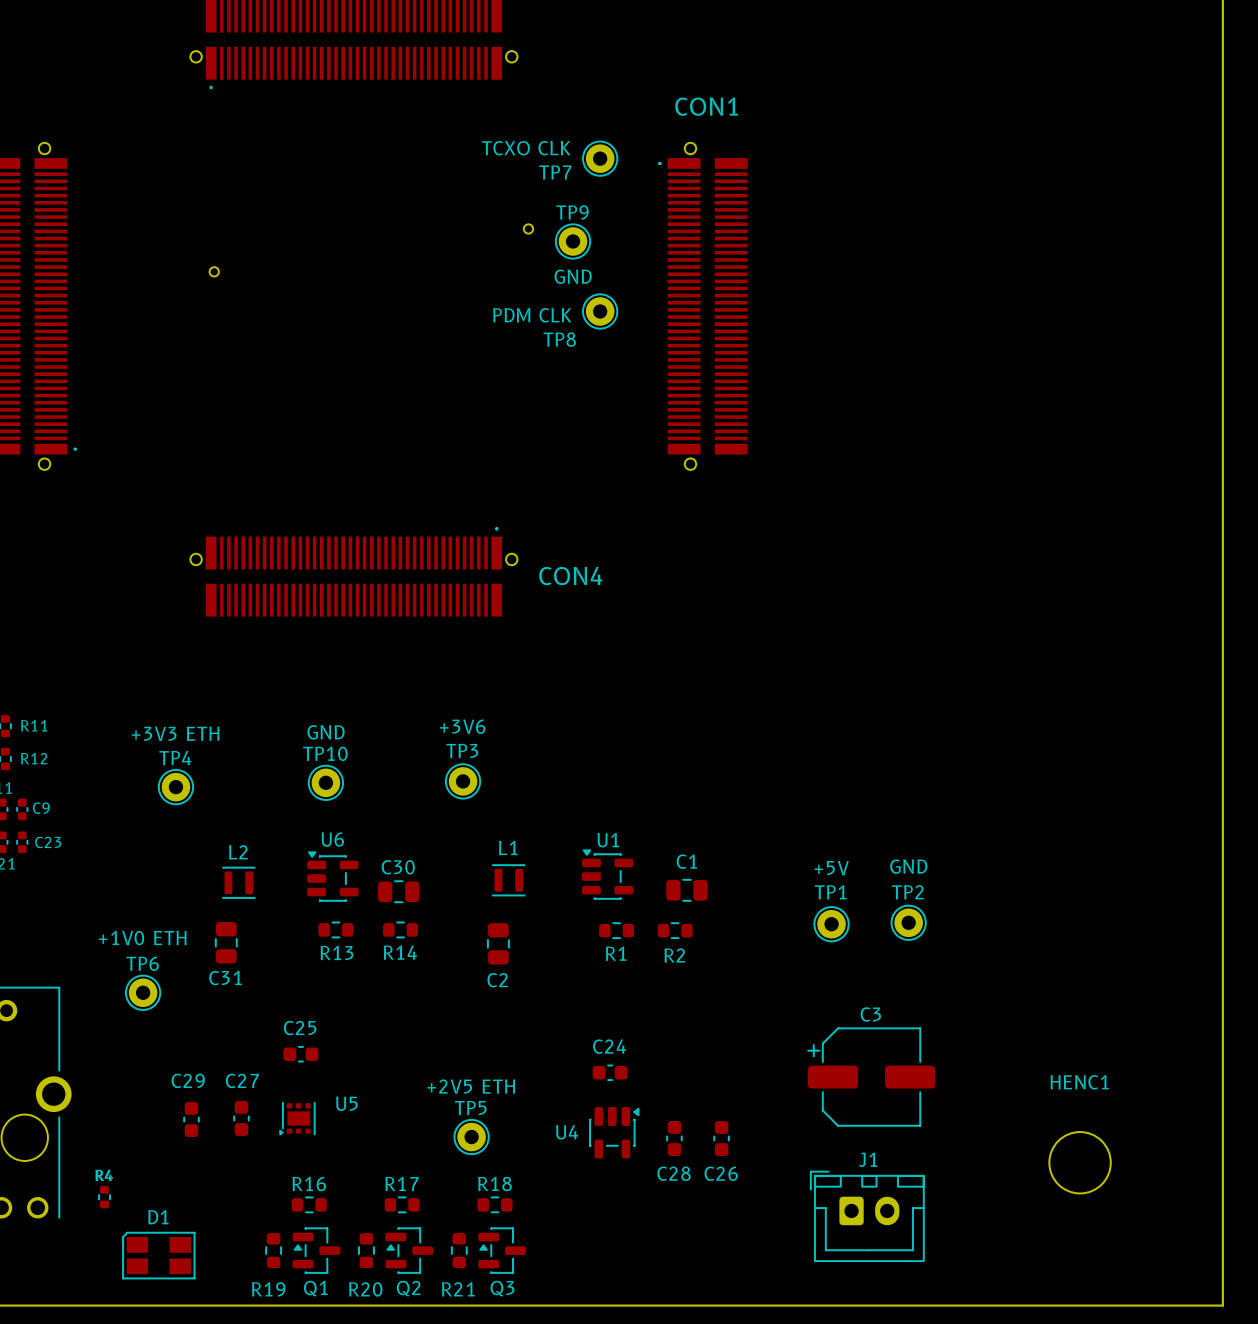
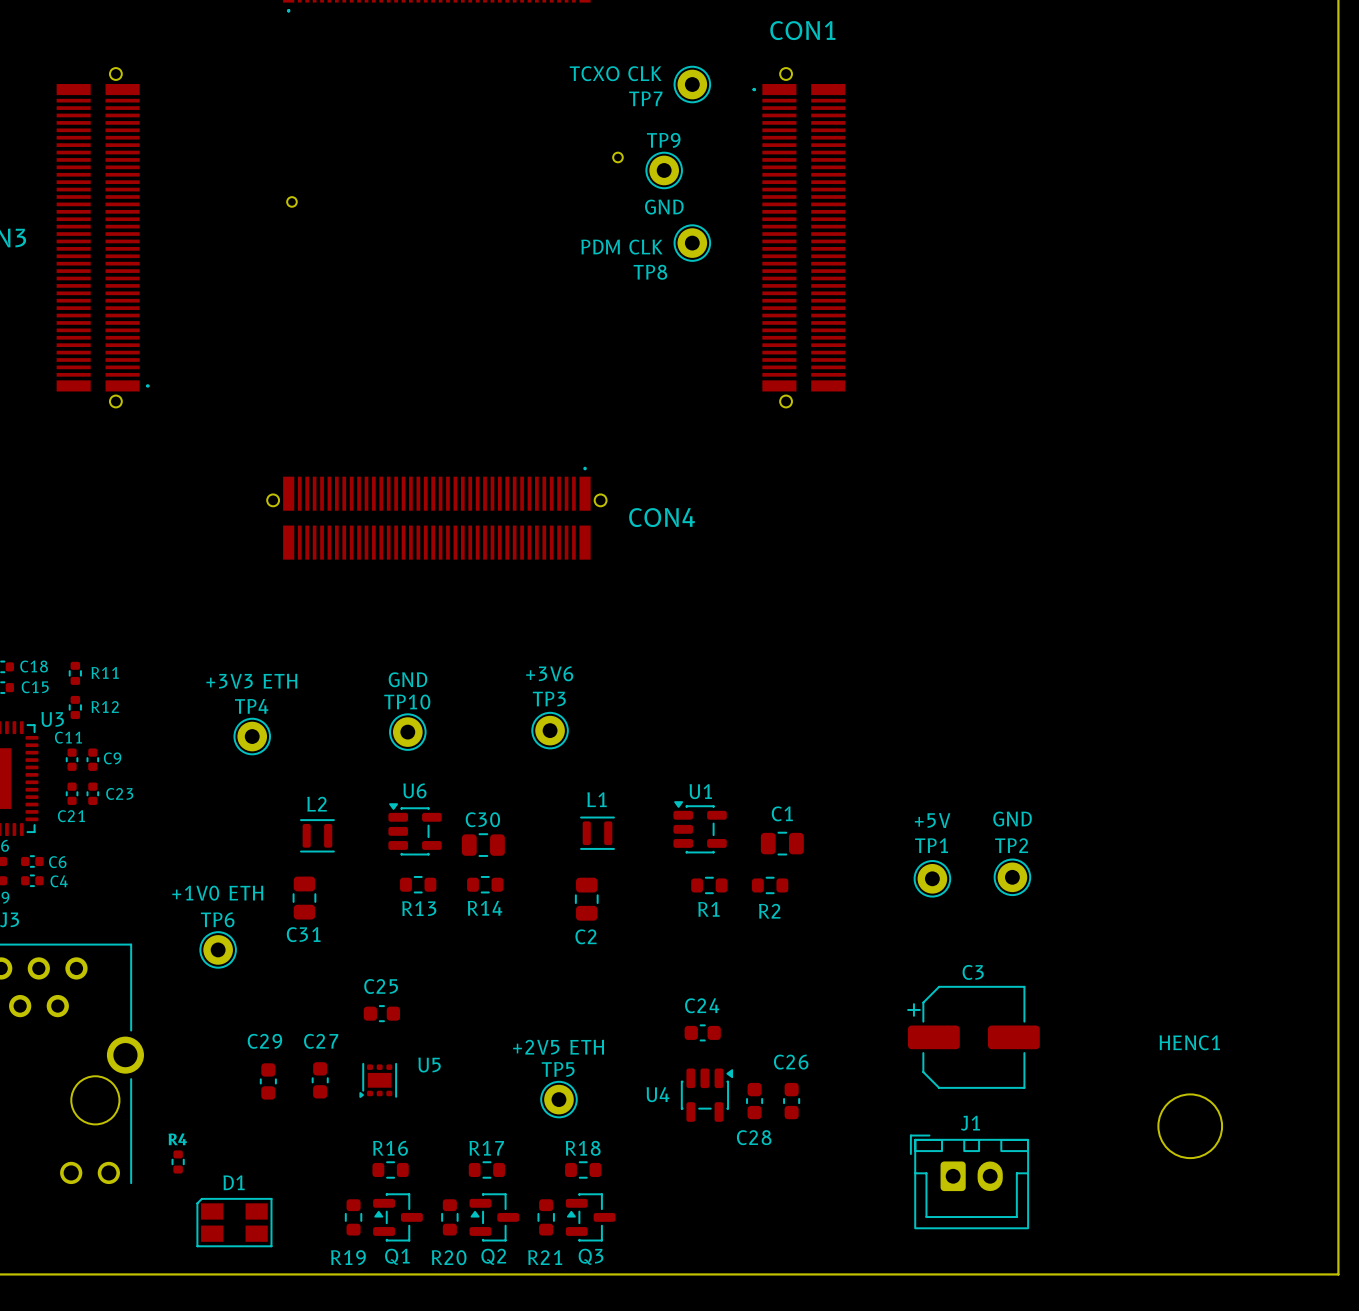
C28 position: (674, 1138) -> (754, 1101)
C26 position: (721, 1138) -> (791, 1101)
C26 name position: C26 (721, 1173) -> C26 (791, 1062)

